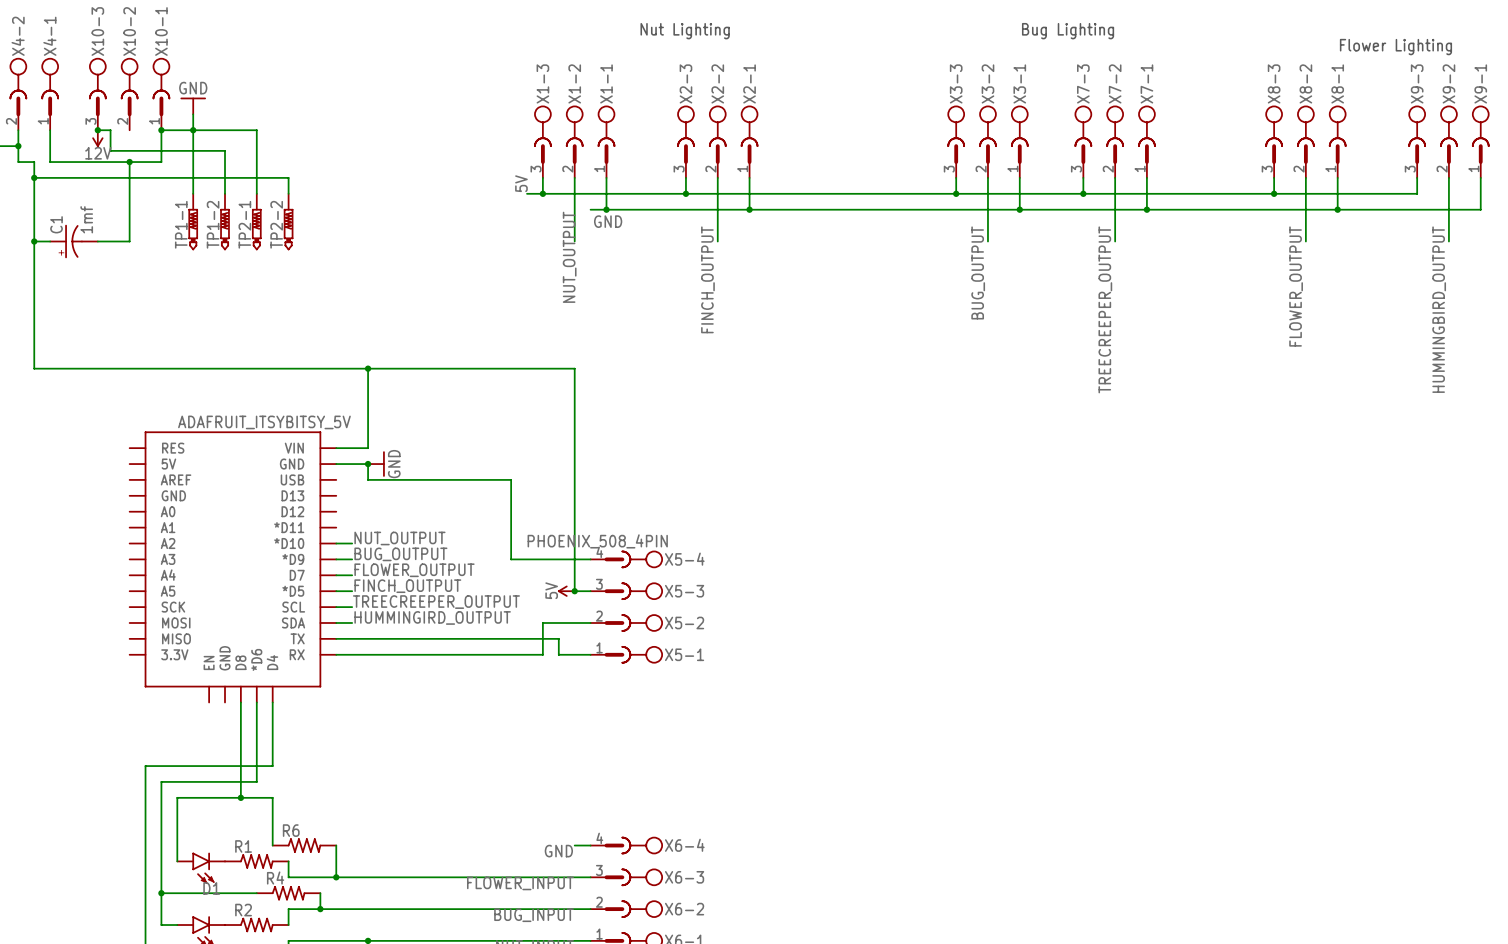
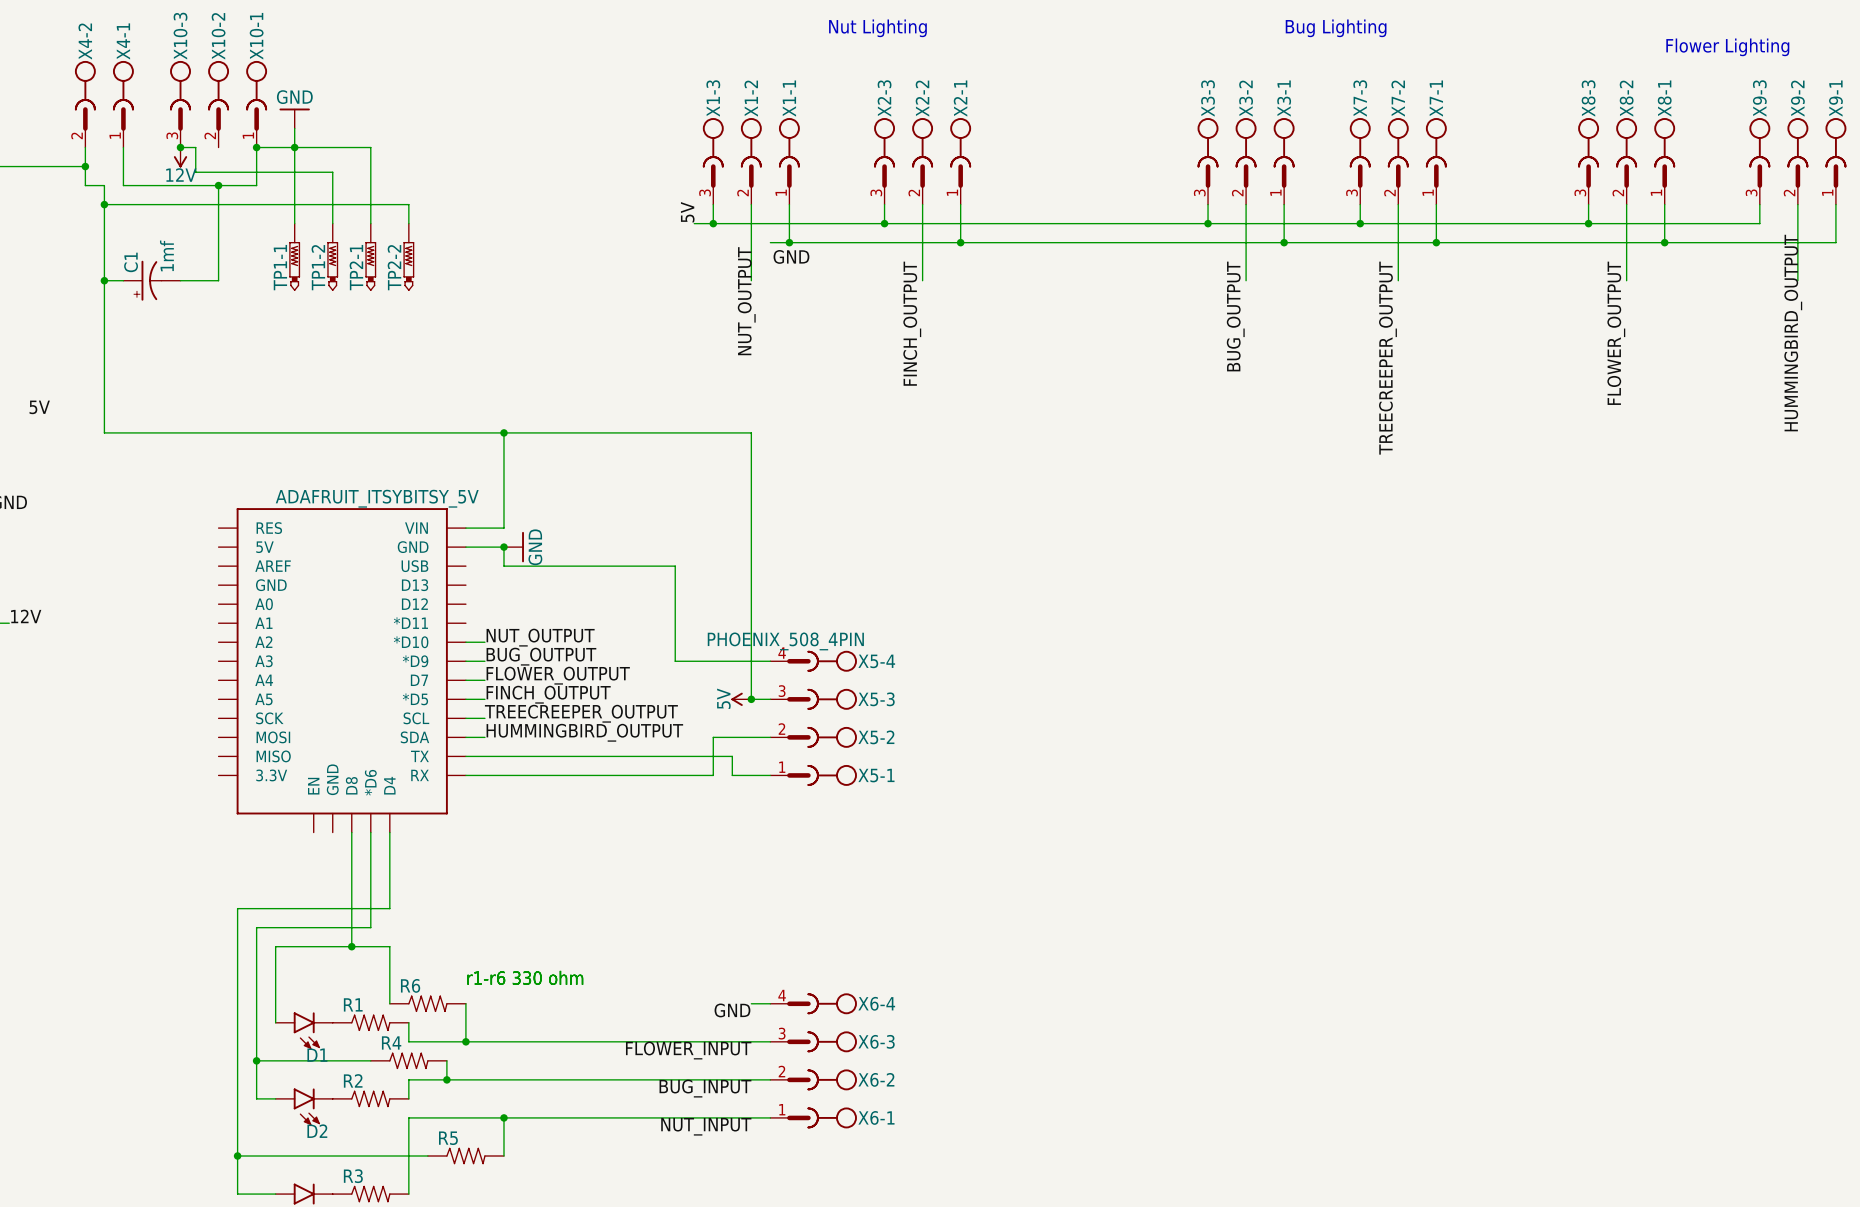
label position: HUMMINGBIRD_OUTPUT (1439, 309) -> HUMMINGBIRD_OUTPUT (1793, 333)
label: HUMMINGIRD_OUTPUT (432, 617) -> HUMMINGBIRD_OUTPUT (584, 732)
text: none -> r1-r6 330 ohm (525, 977)

